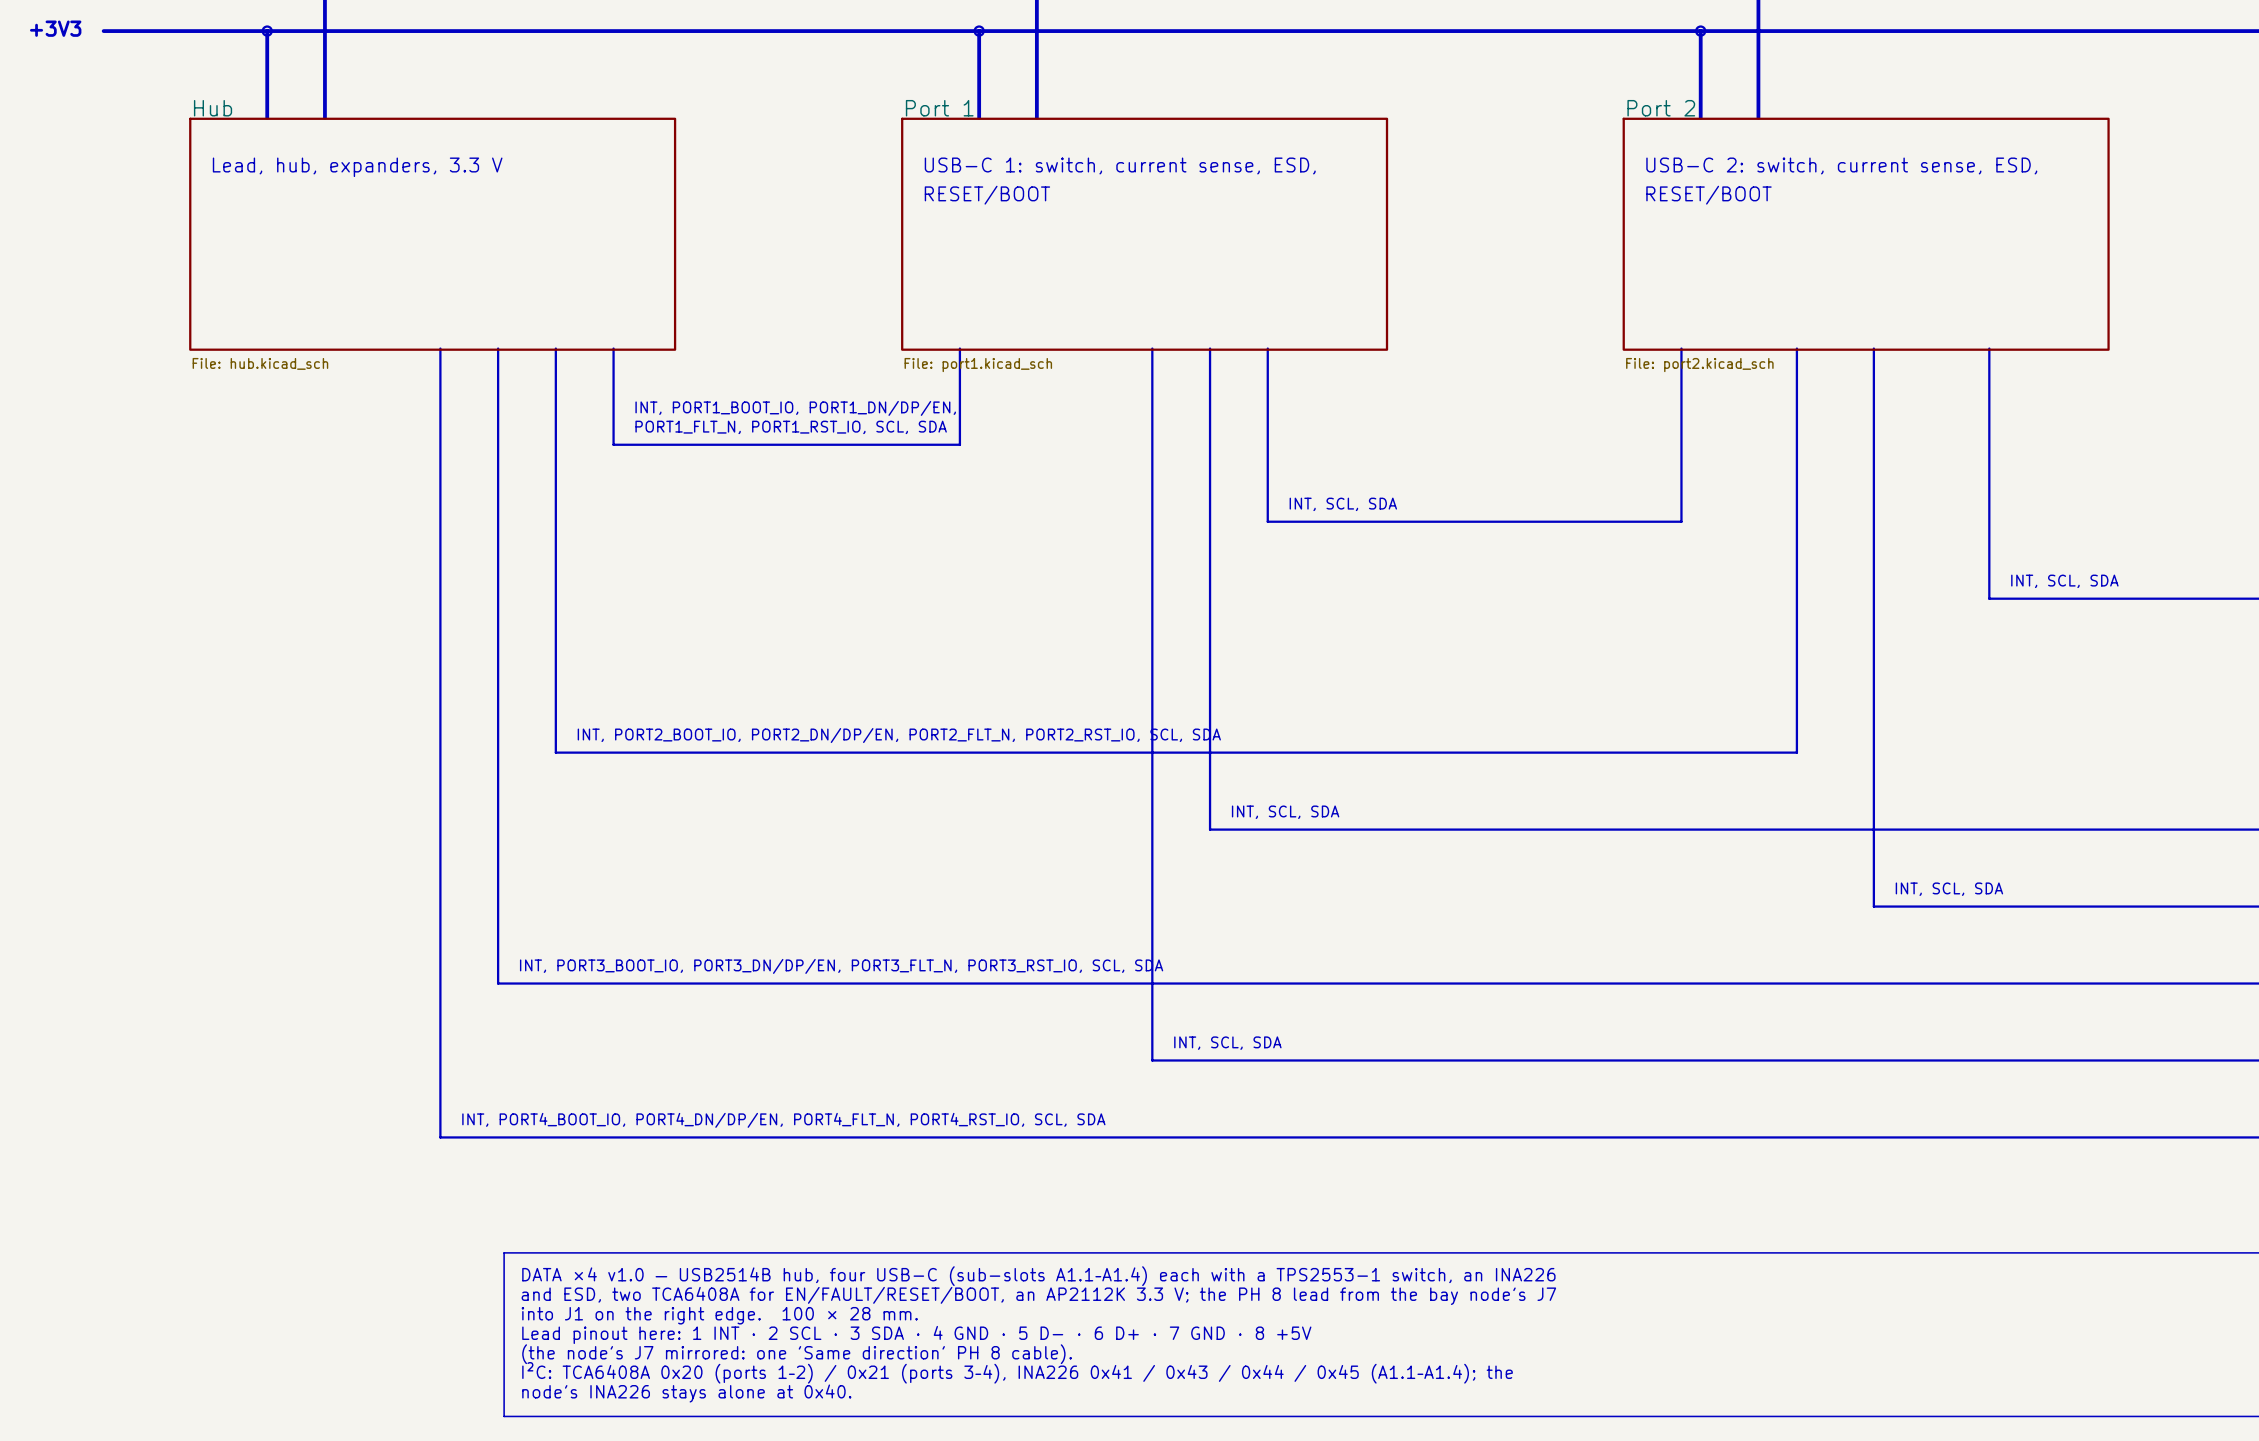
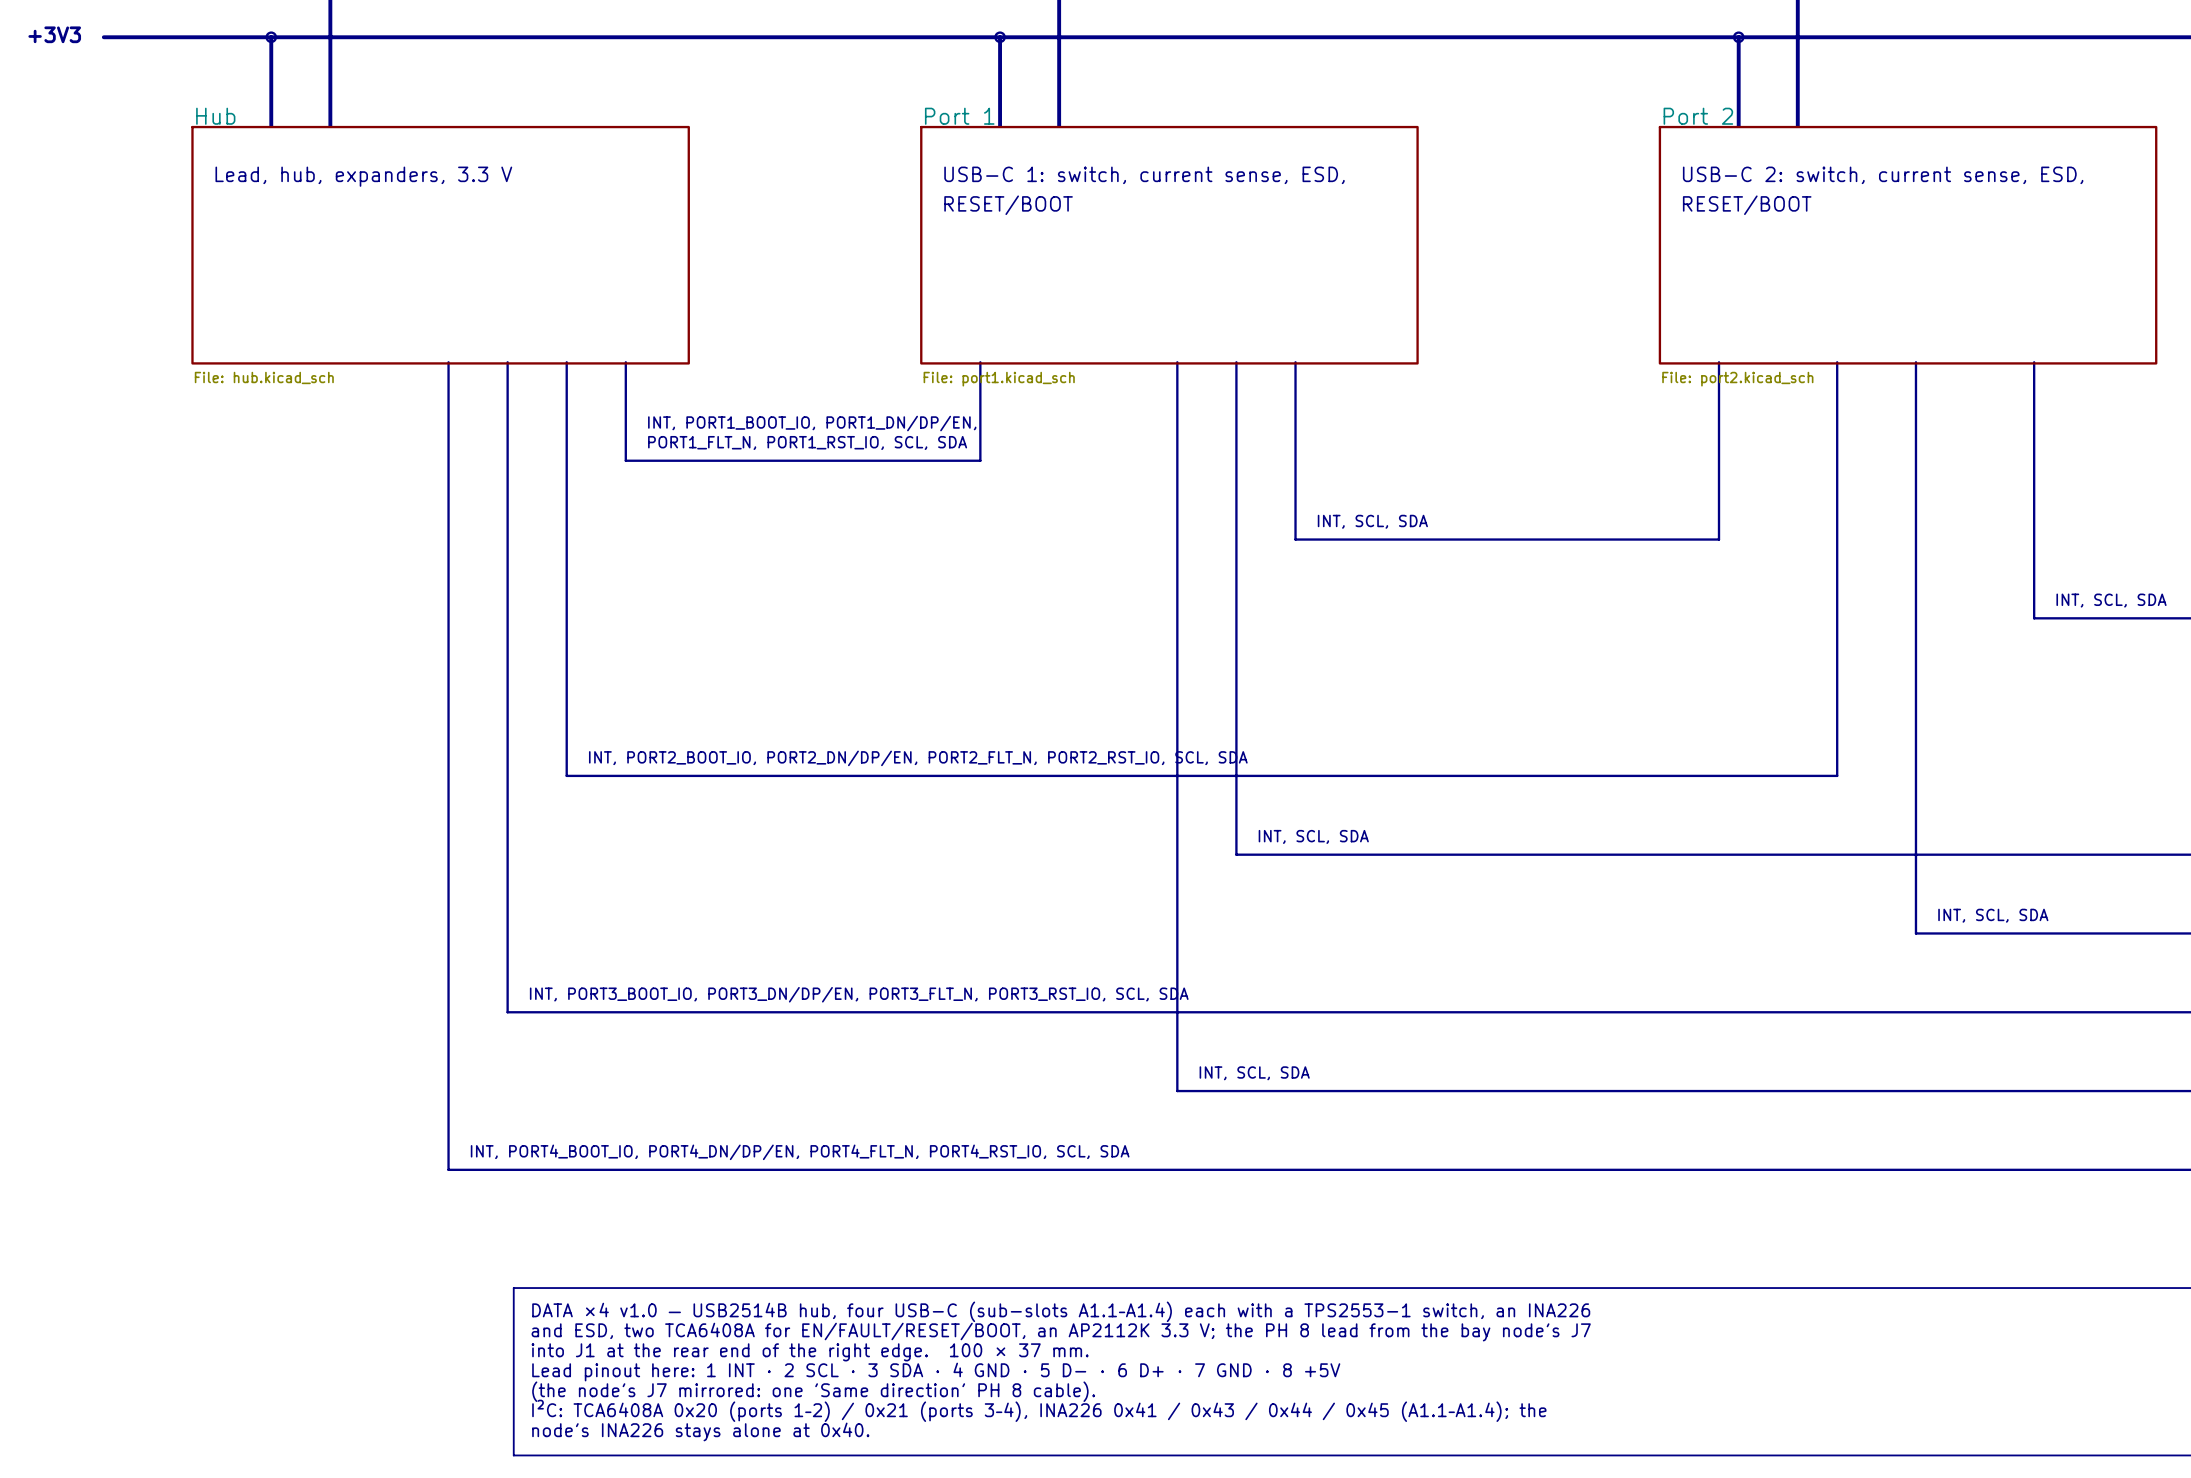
text: into J1 on the right edge. 100 × 28 mm. (719, 1315) -> into J1 at the rear end of the right edge. 100 × 37 mm. (810, 1352)

